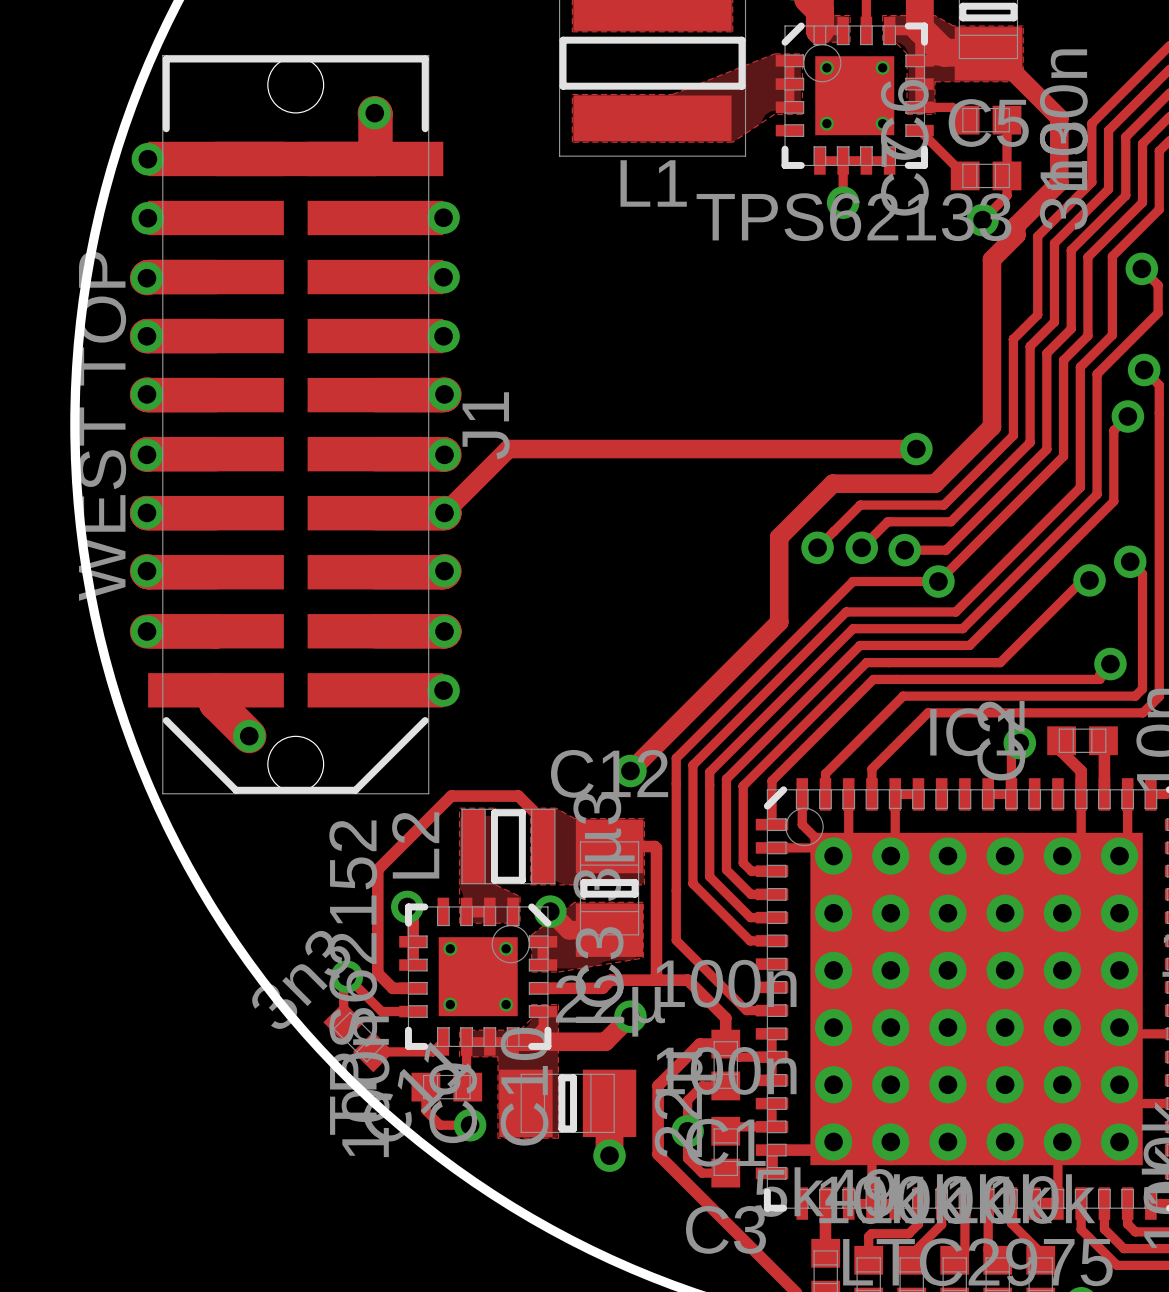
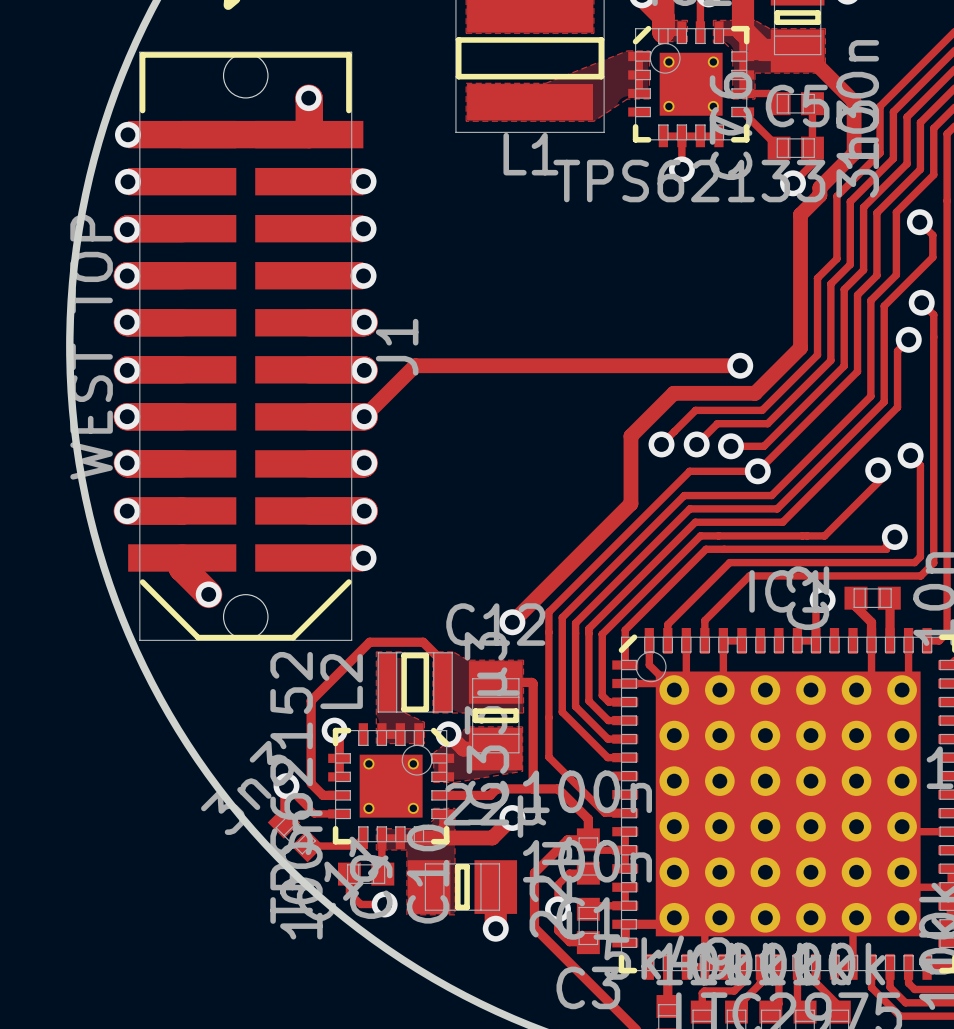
track: (1089, 580) (1082, 580) (1000, 662) -> (880, 479) (824, 535) (807, 535)

